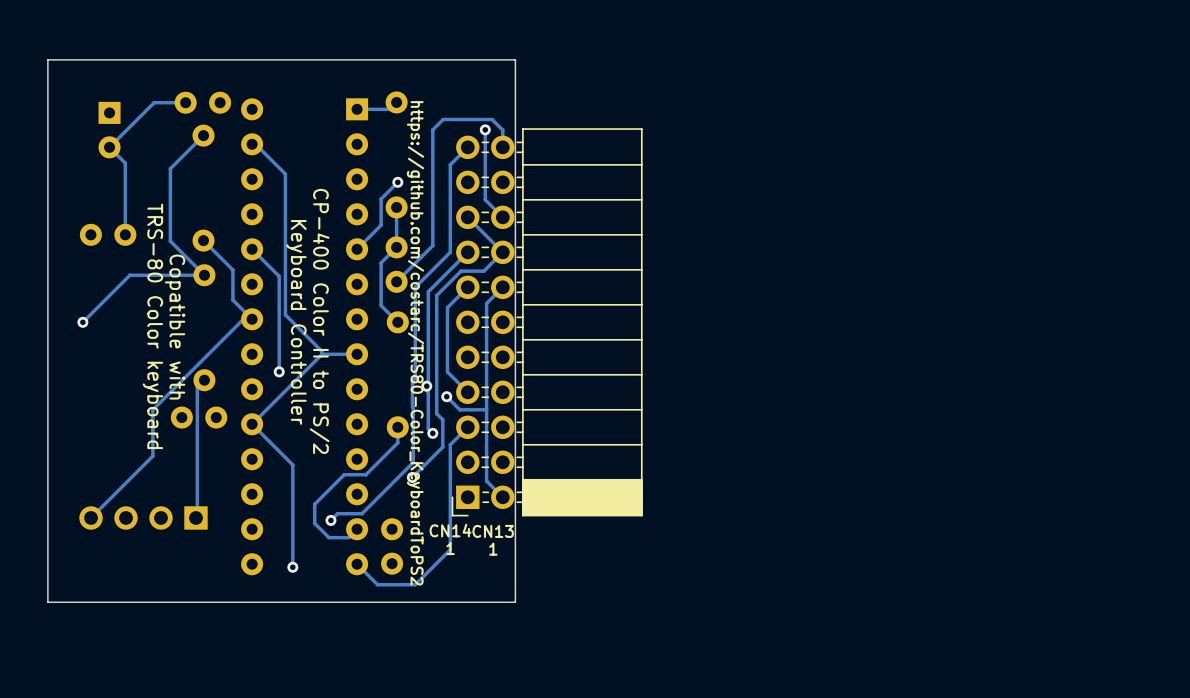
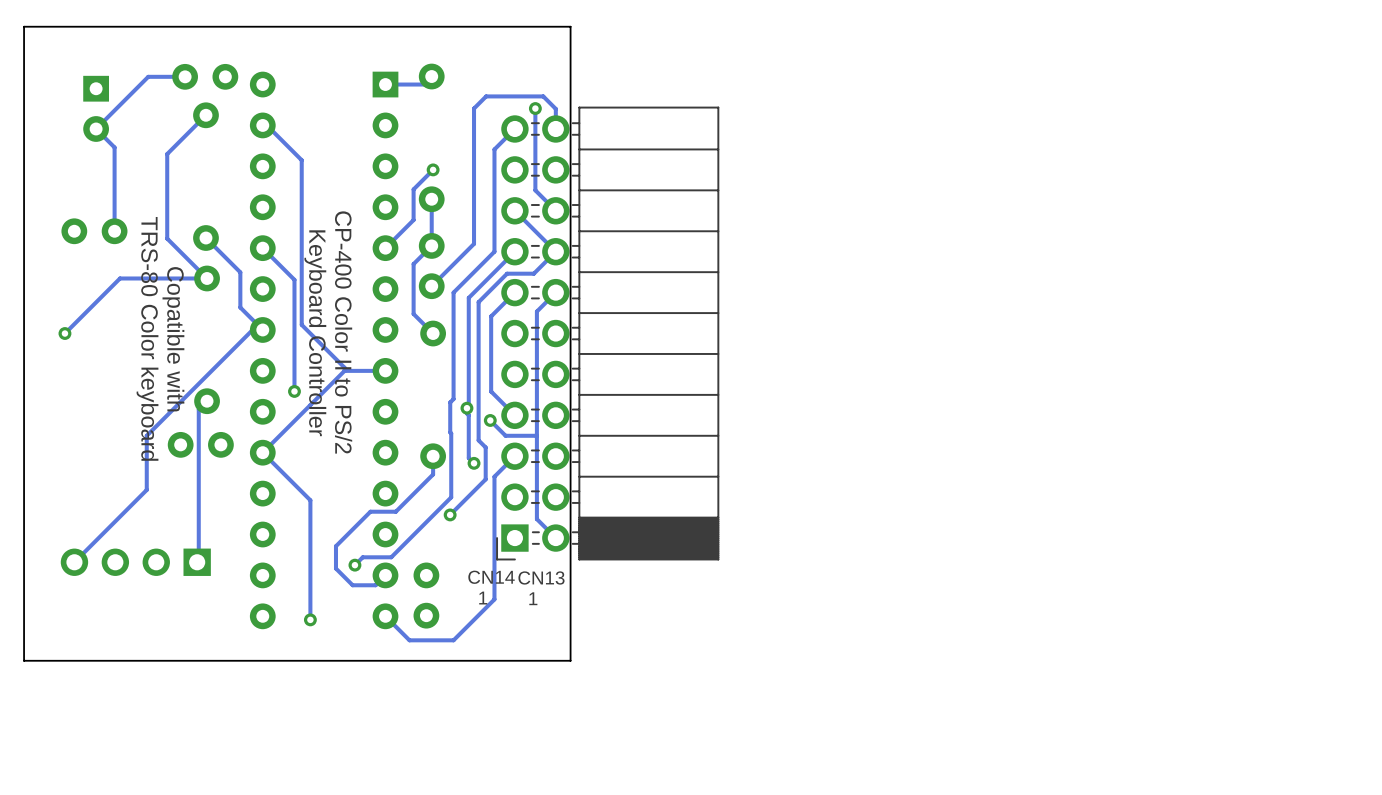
text: https://github.com/costarc/TRS80-Color_KeyboardToPS2 (415, 343) -> none

